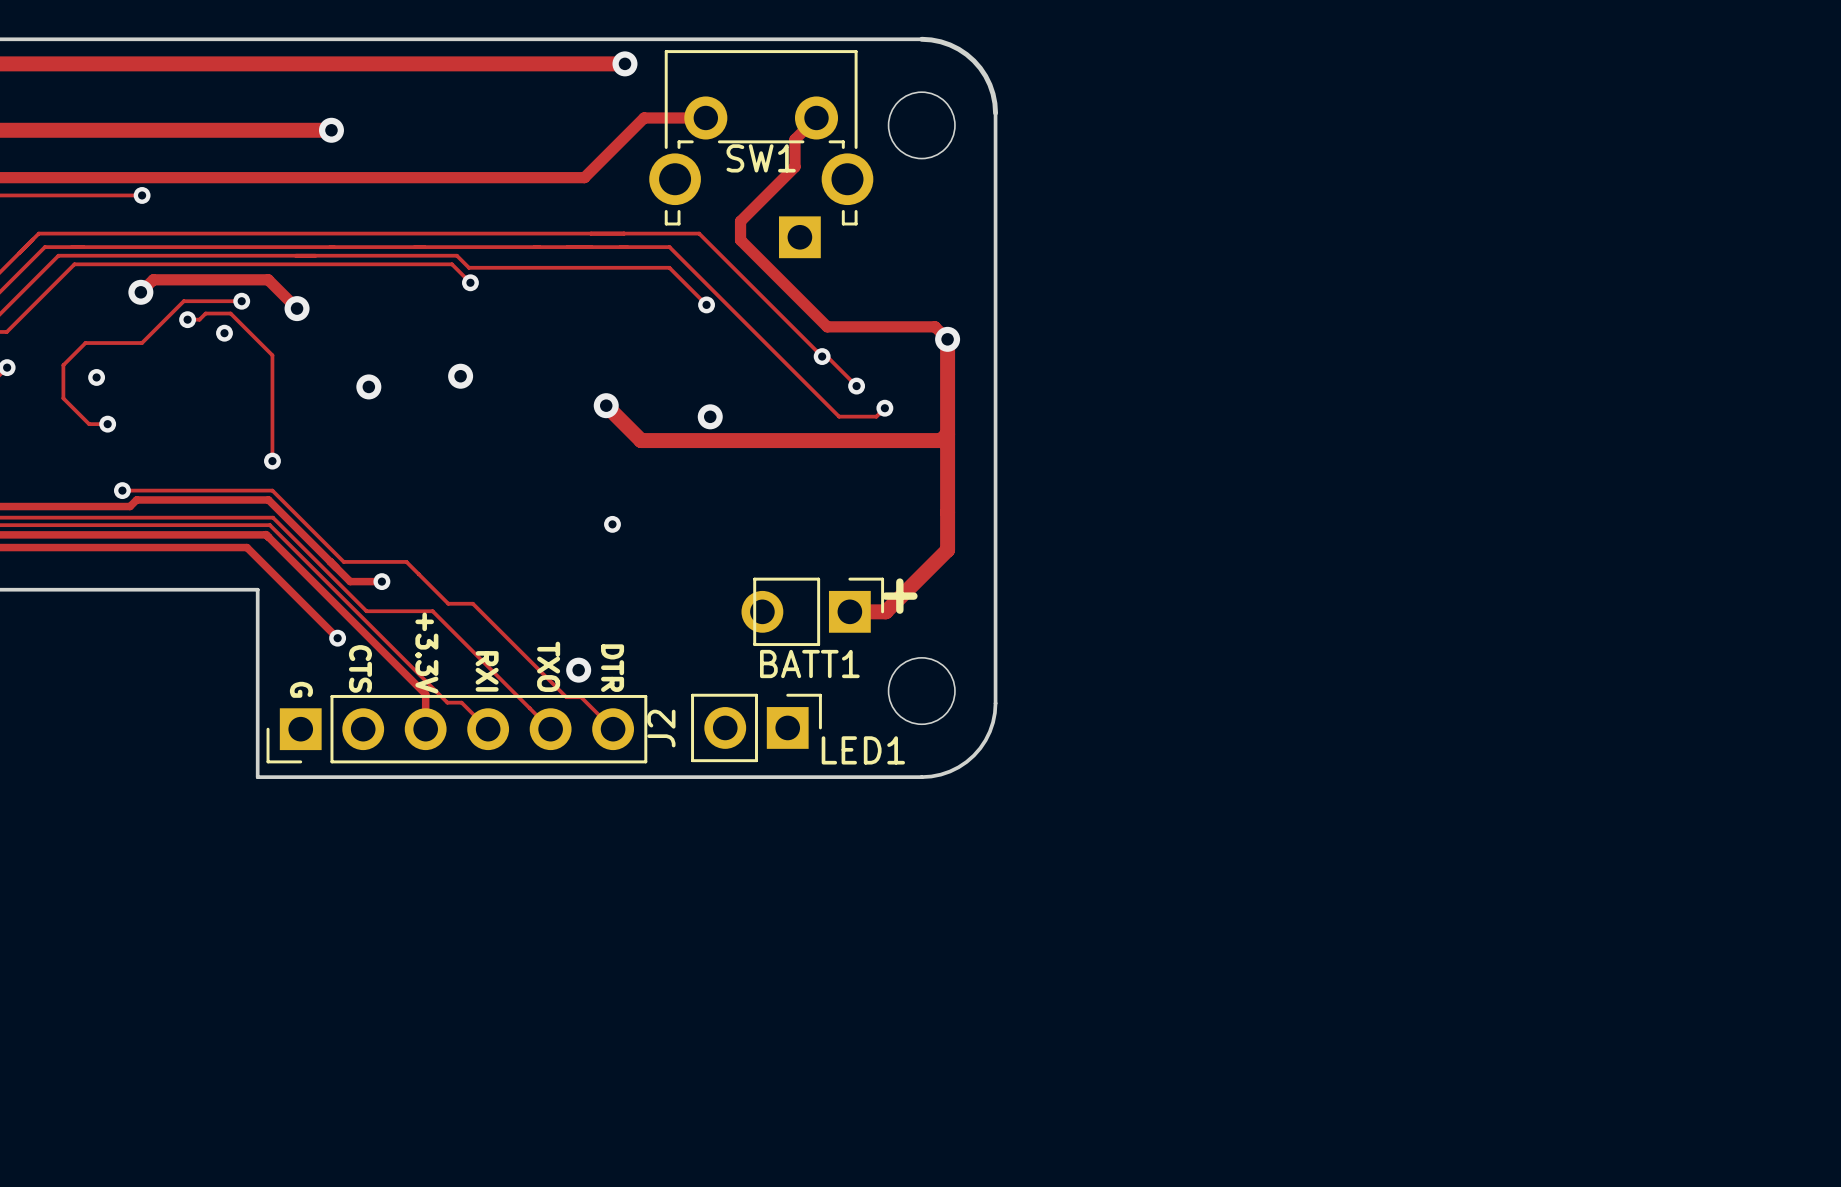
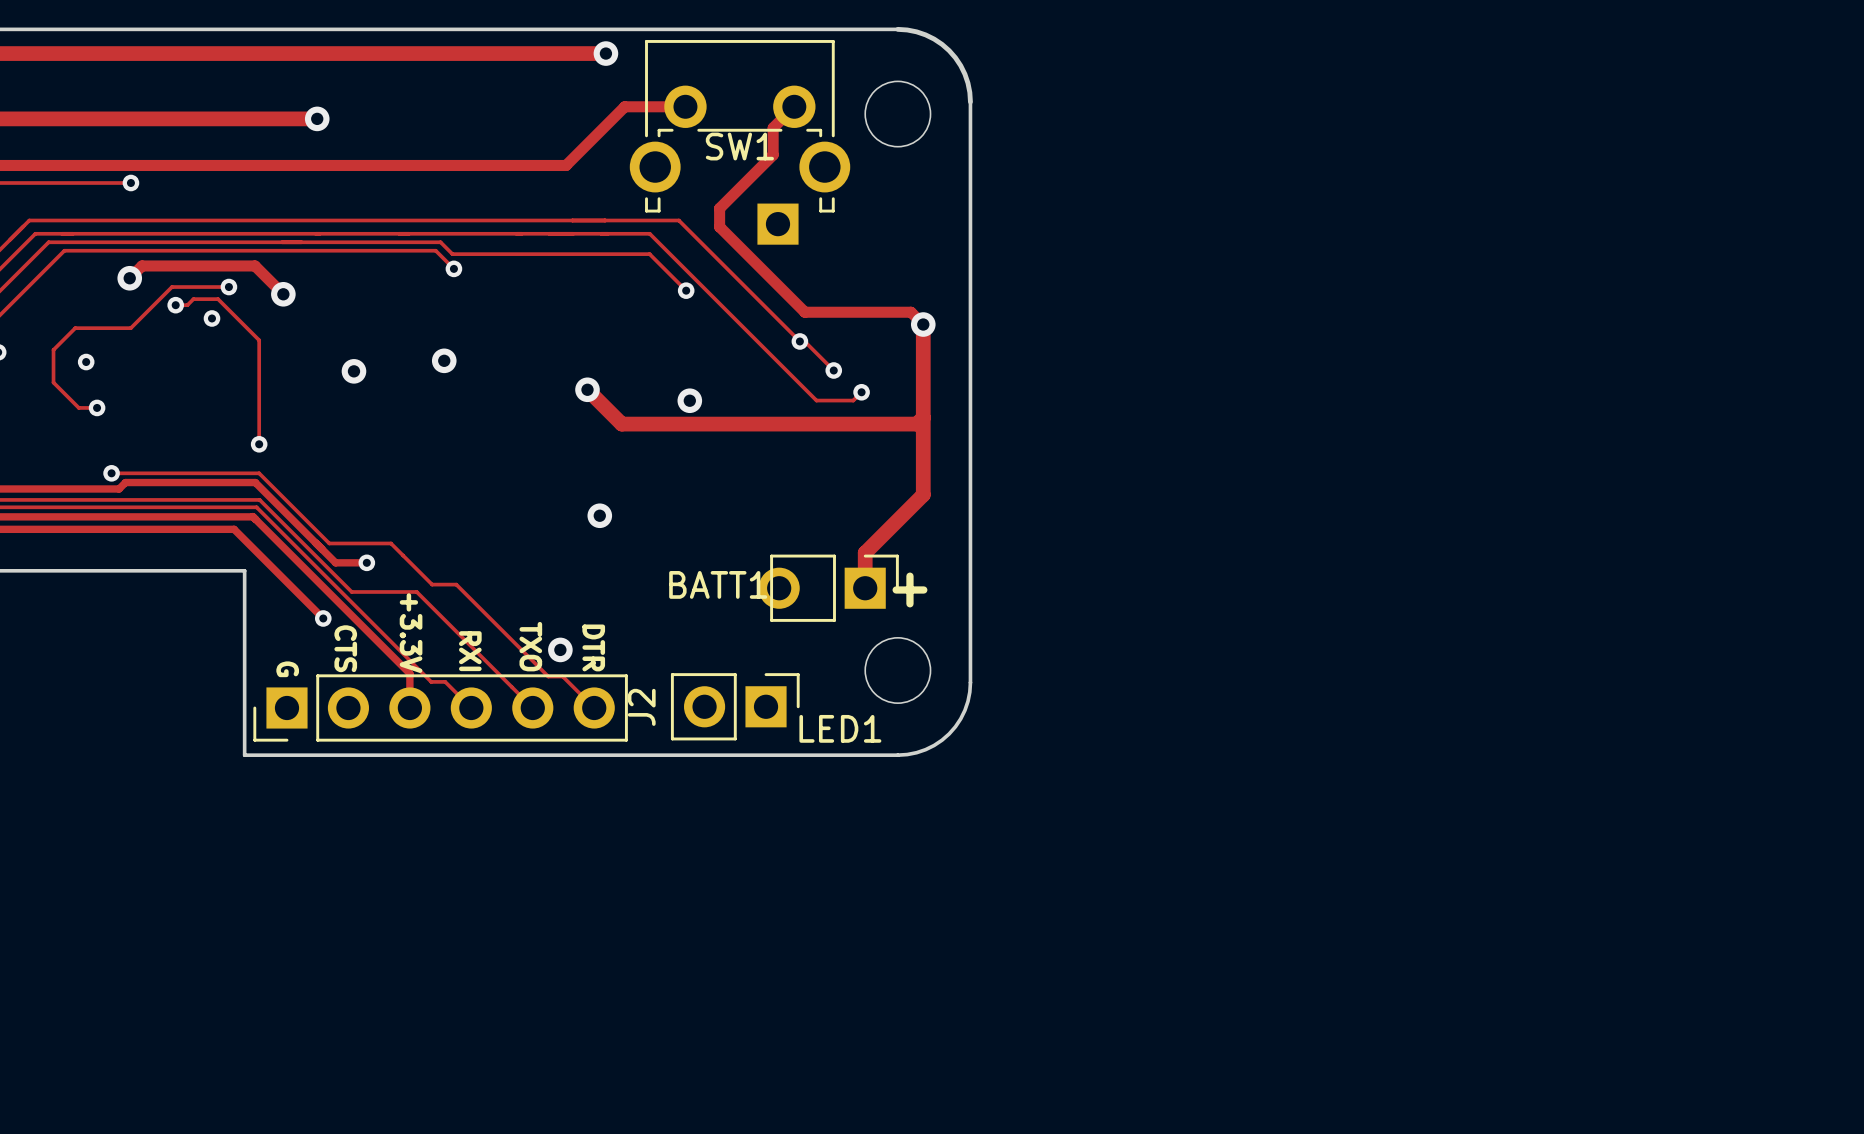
track: (947, 512) (947, 550) (885, 611) (849, 611) -> (923, 494) (865, 552) (865, 588)
via size: [604, 515, 621, 533] -> [587, 503, 613, 529]
text position: + (899, 596) -> + (909, 589)
BATT1 position: (812, 611) -> (828, 588)
BATT1 name position: BATT1 (809, 664) -> BATT1 (718, 584)

